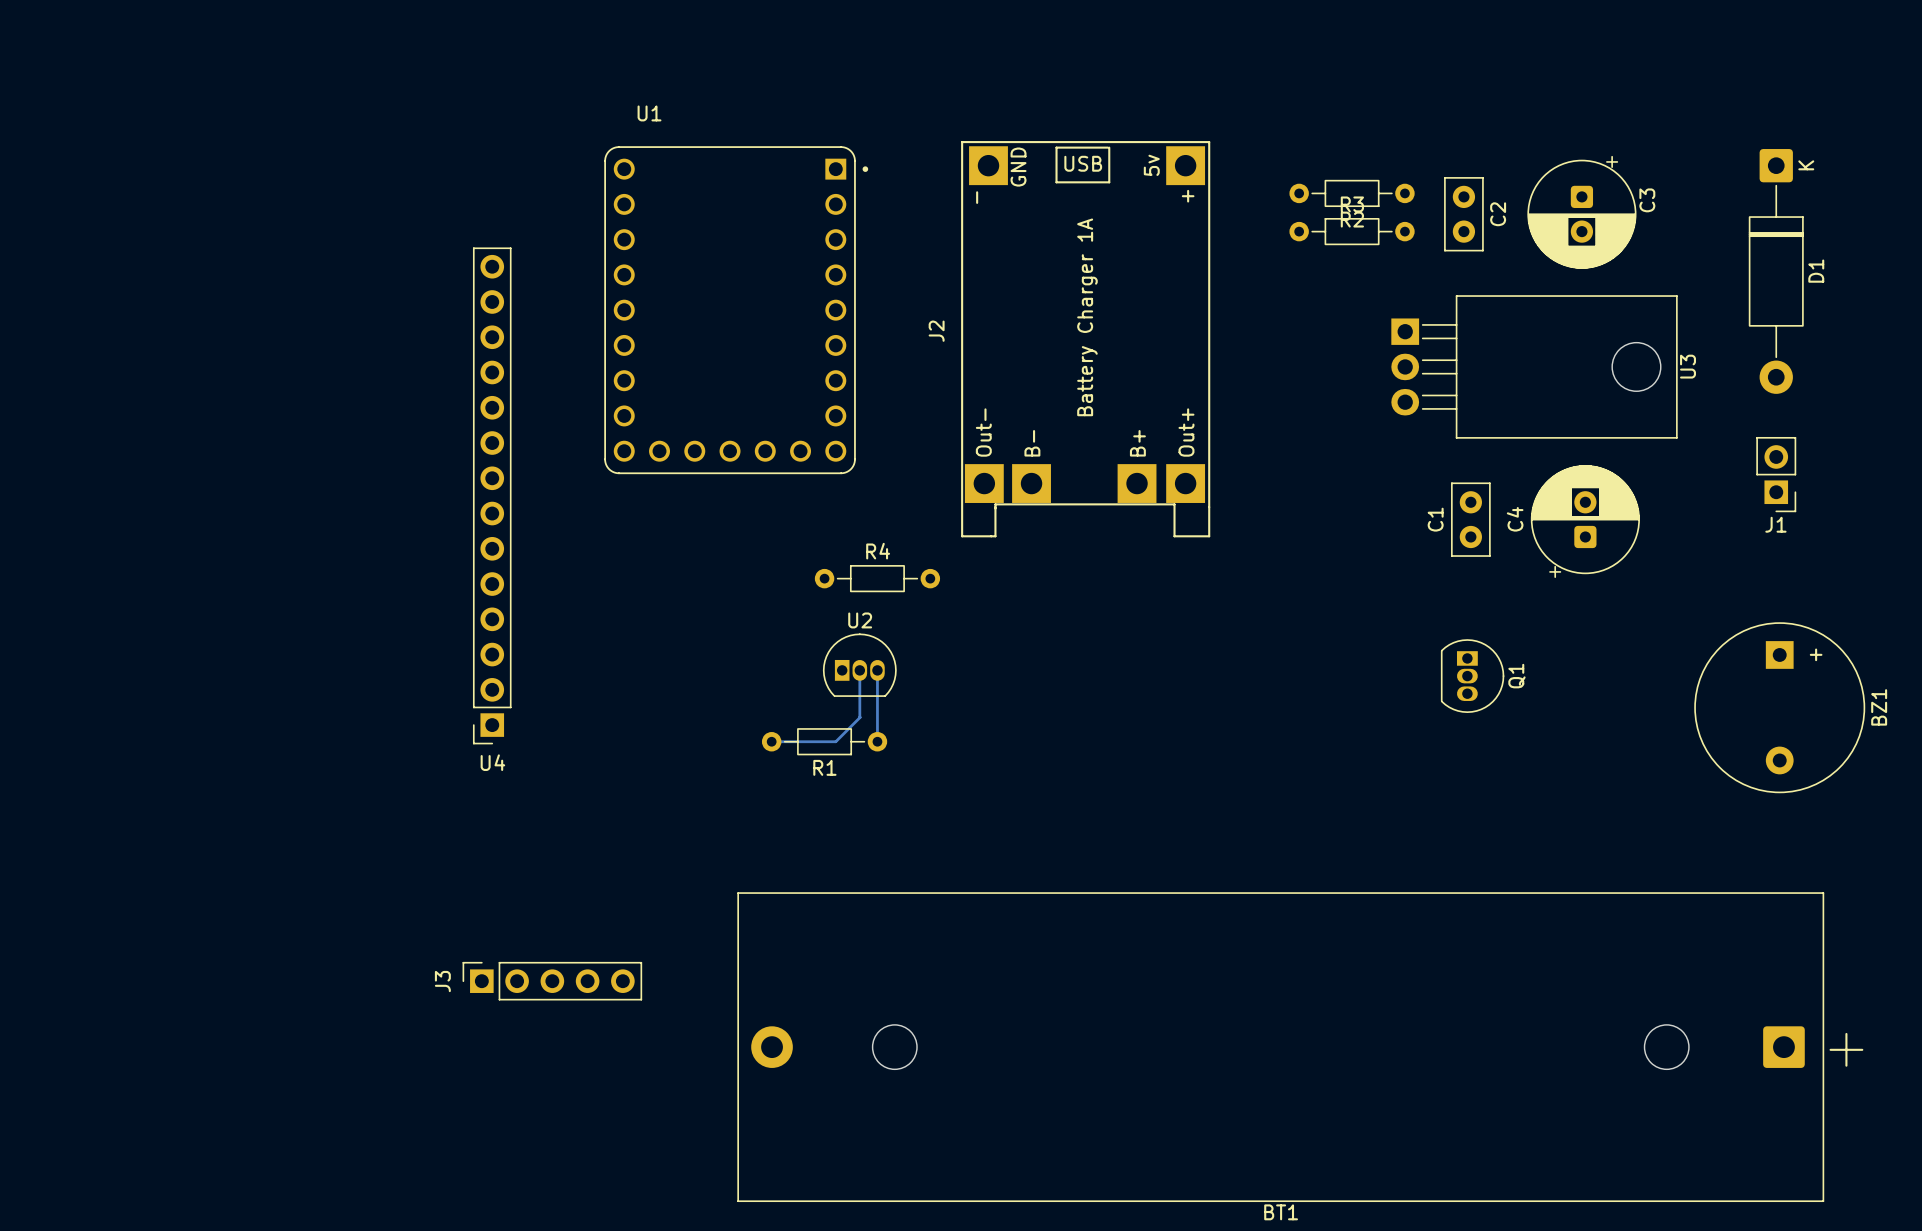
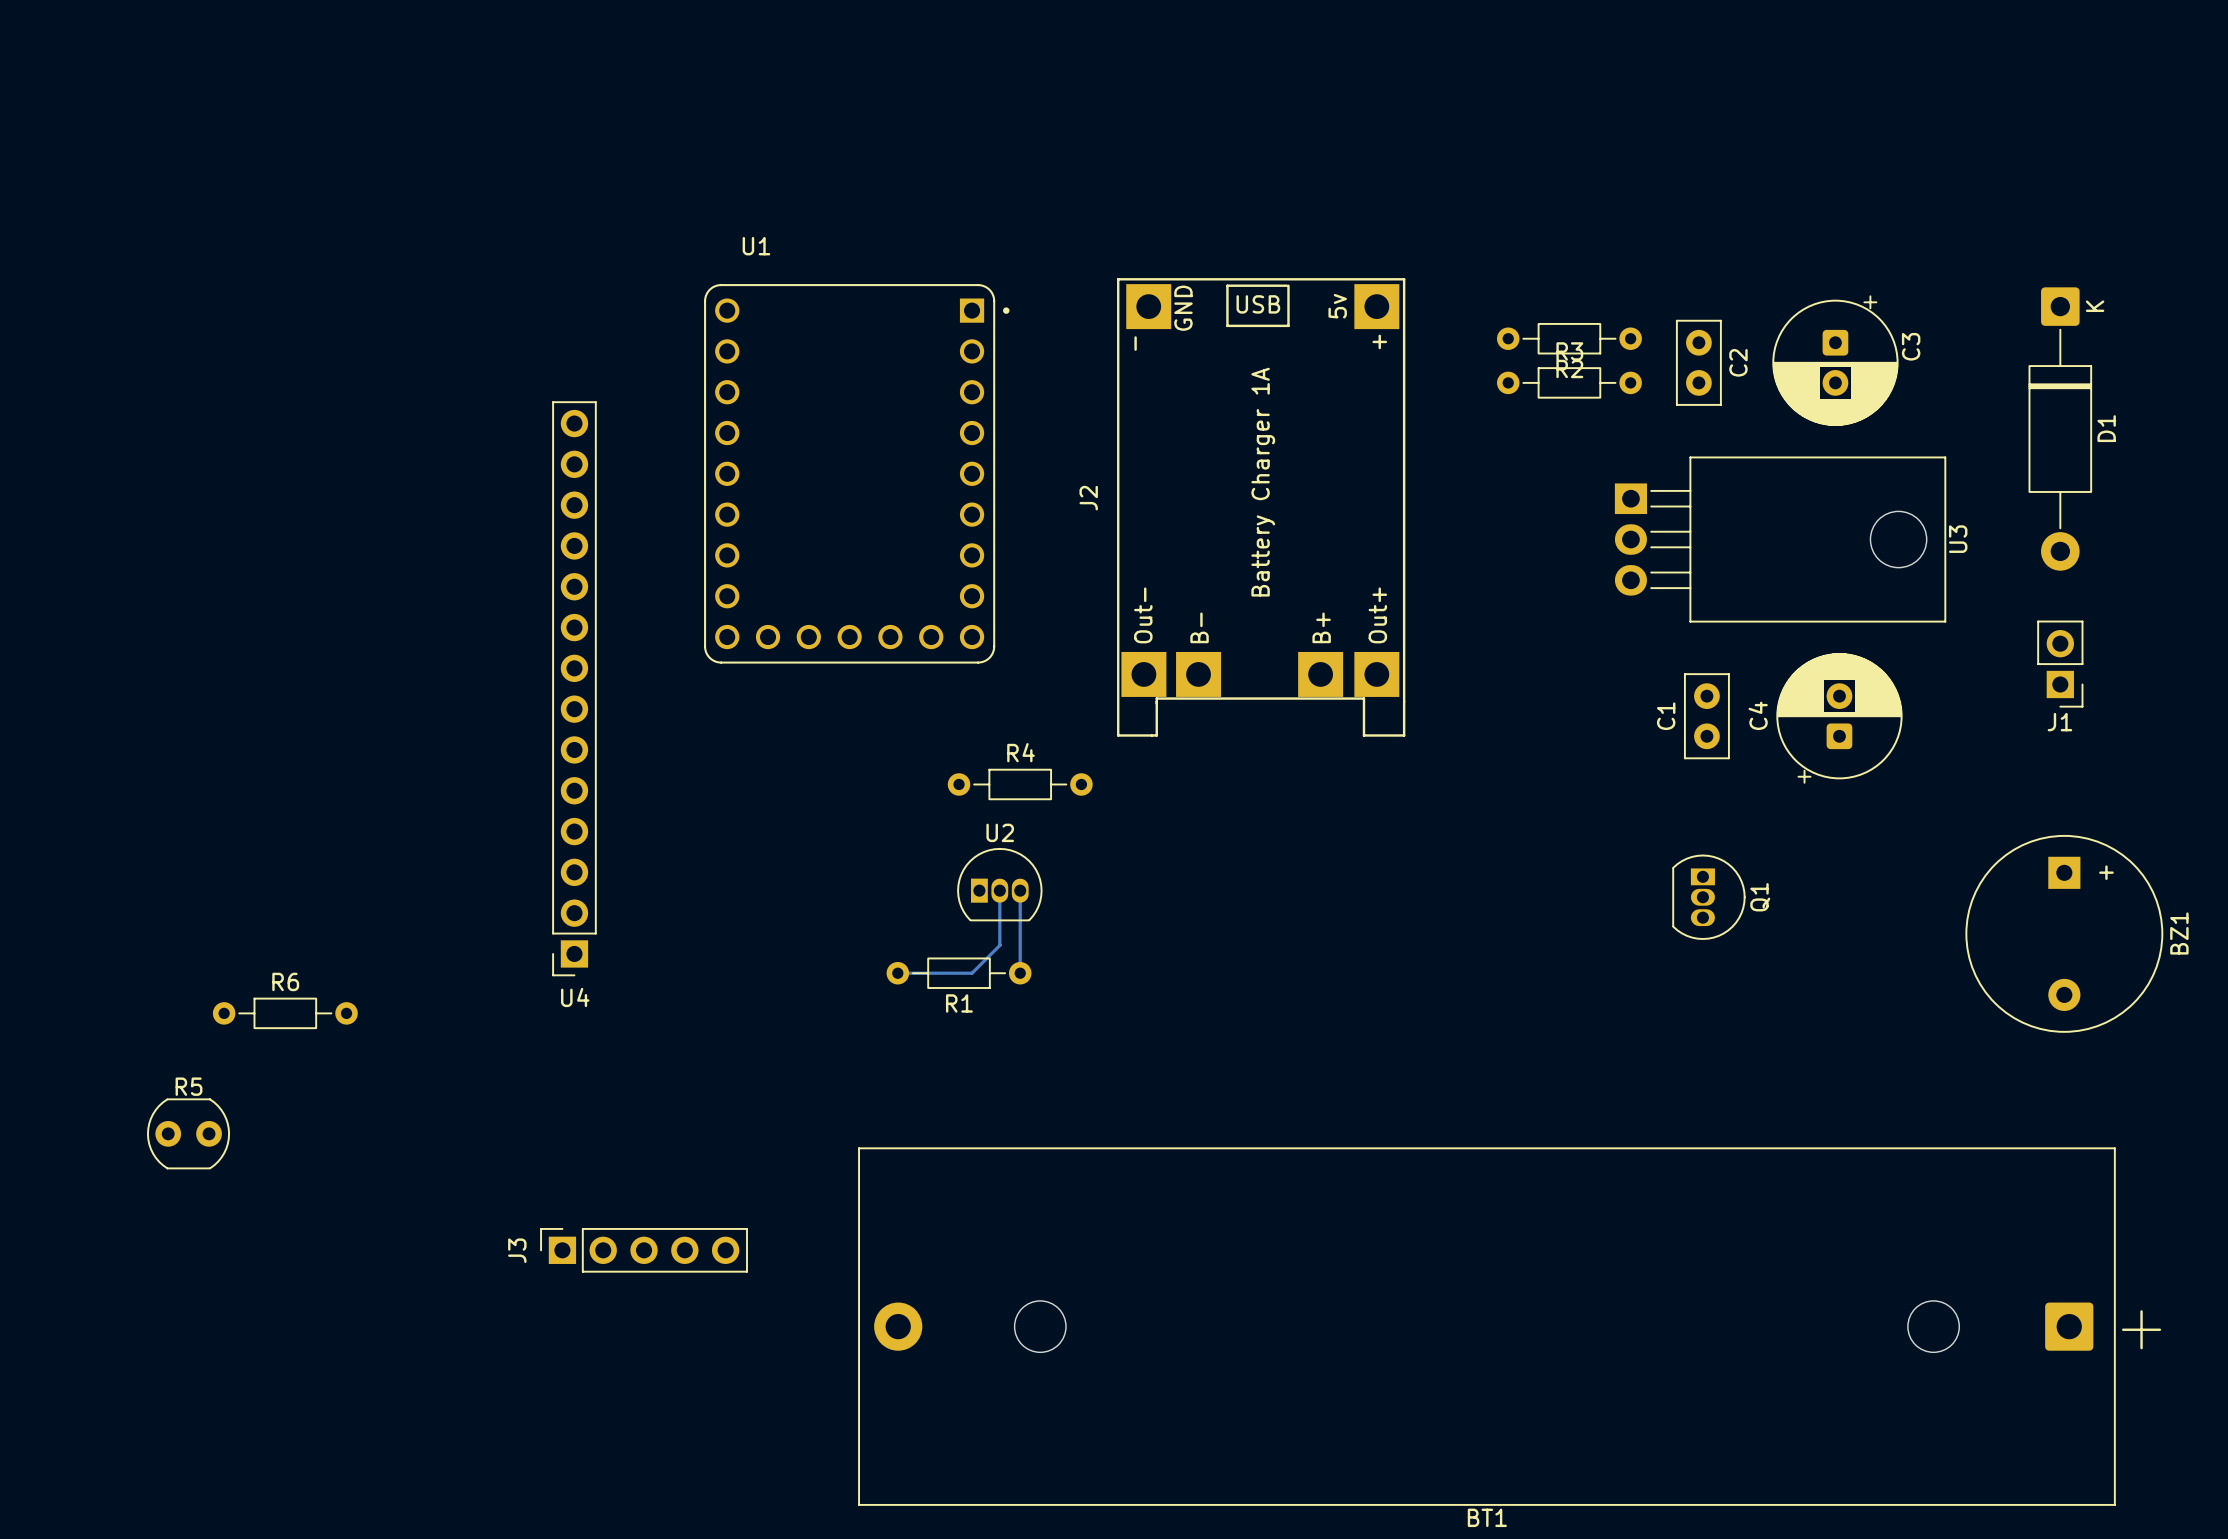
R6: none -> (285, 1013)
R5: none -> (188, 1133)

